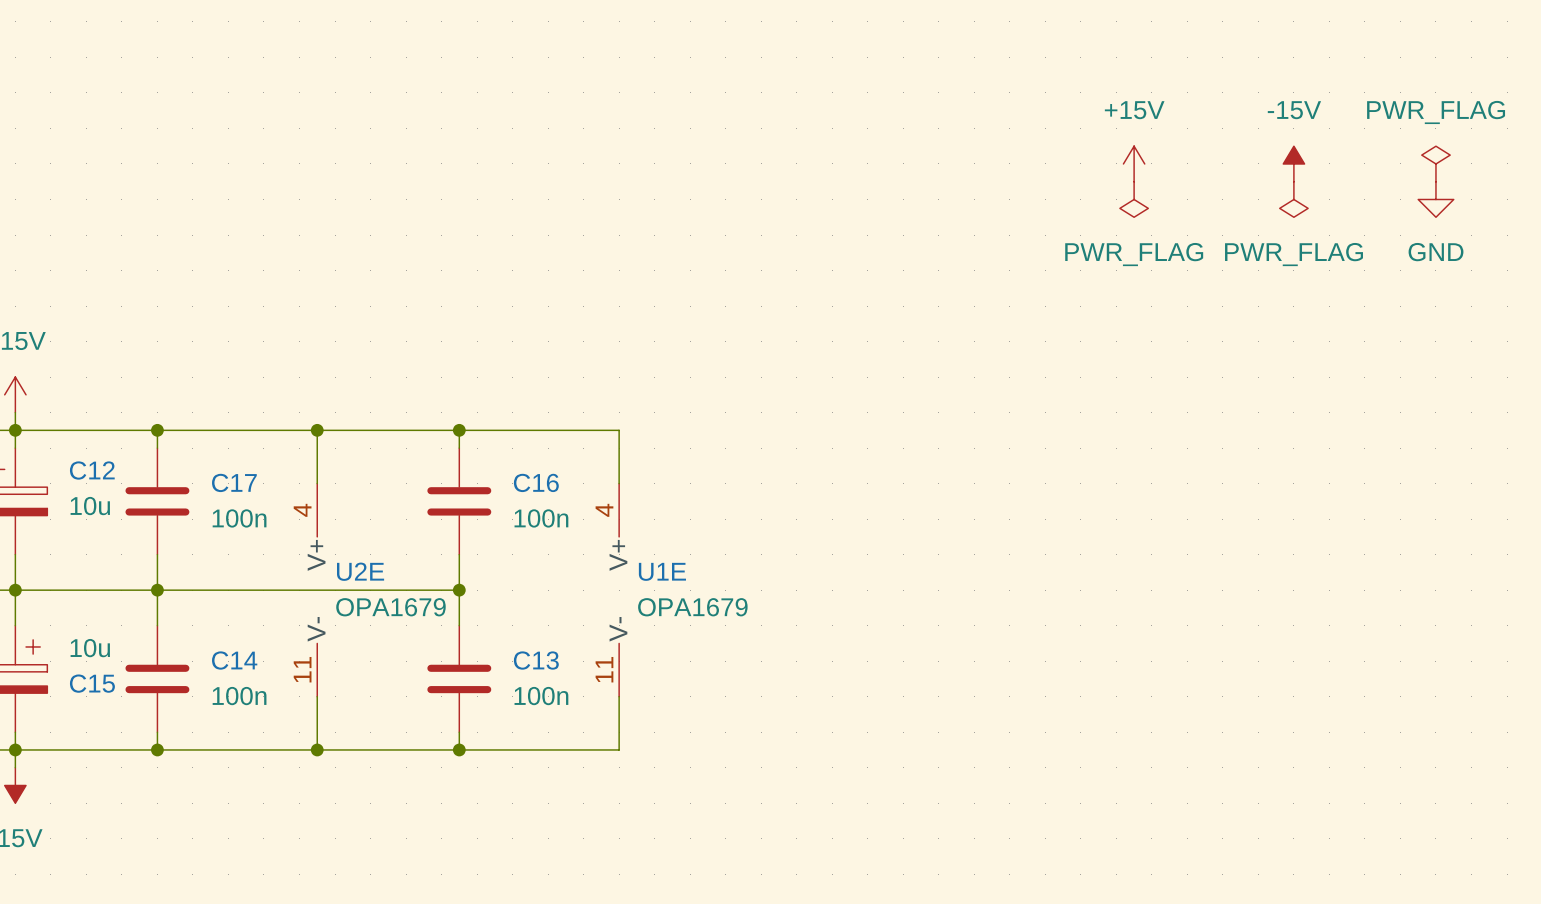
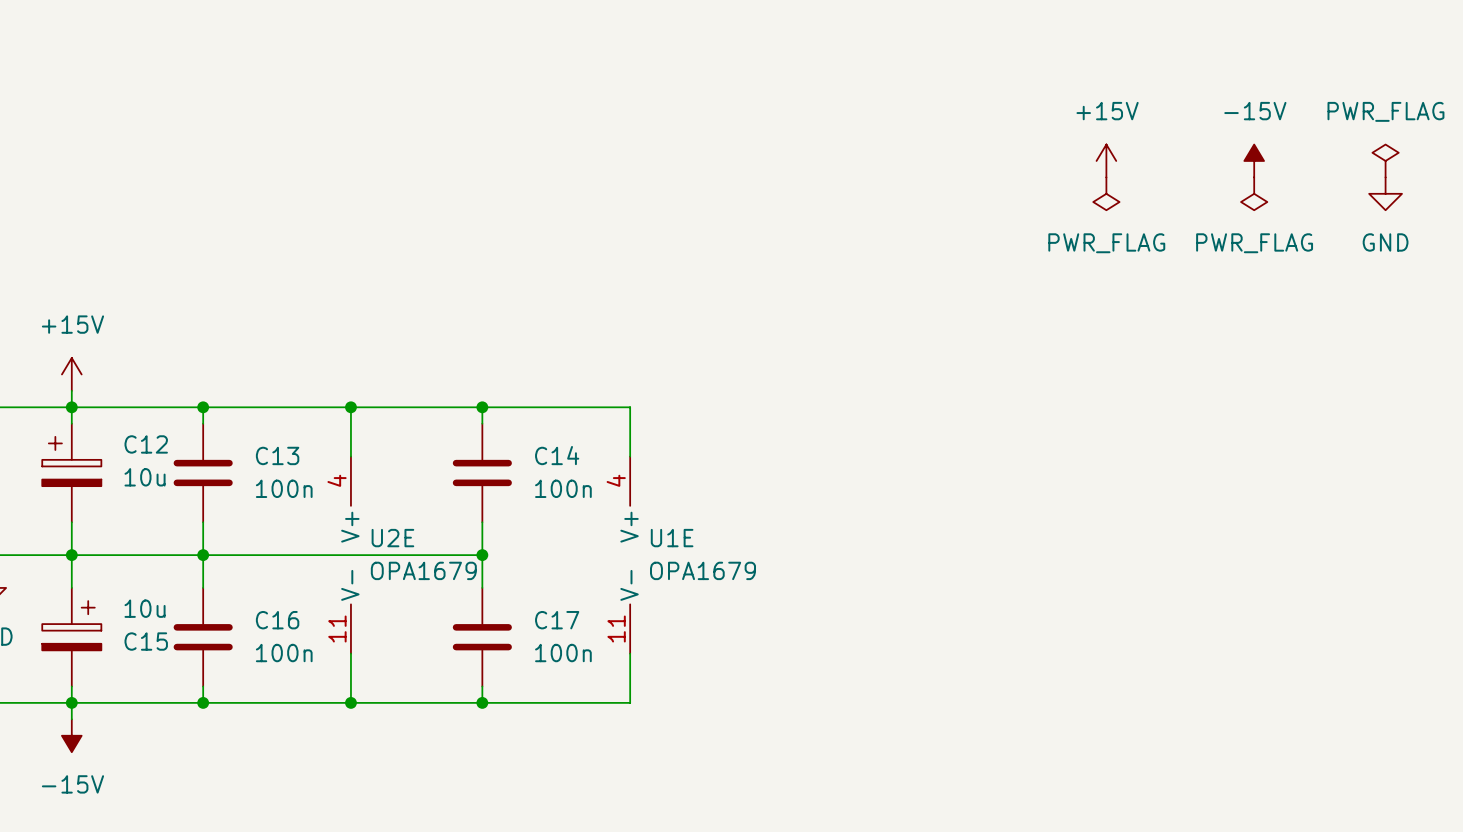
C17 name: C17 (234, 482) -> C13 (277, 455)
C16 name: C16 (536, 482) -> C14 (557, 455)
C14 name: C14 (234, 660) -> C16 (277, 620)
C13 name: C13 (536, 660) -> C17 (557, 620)

